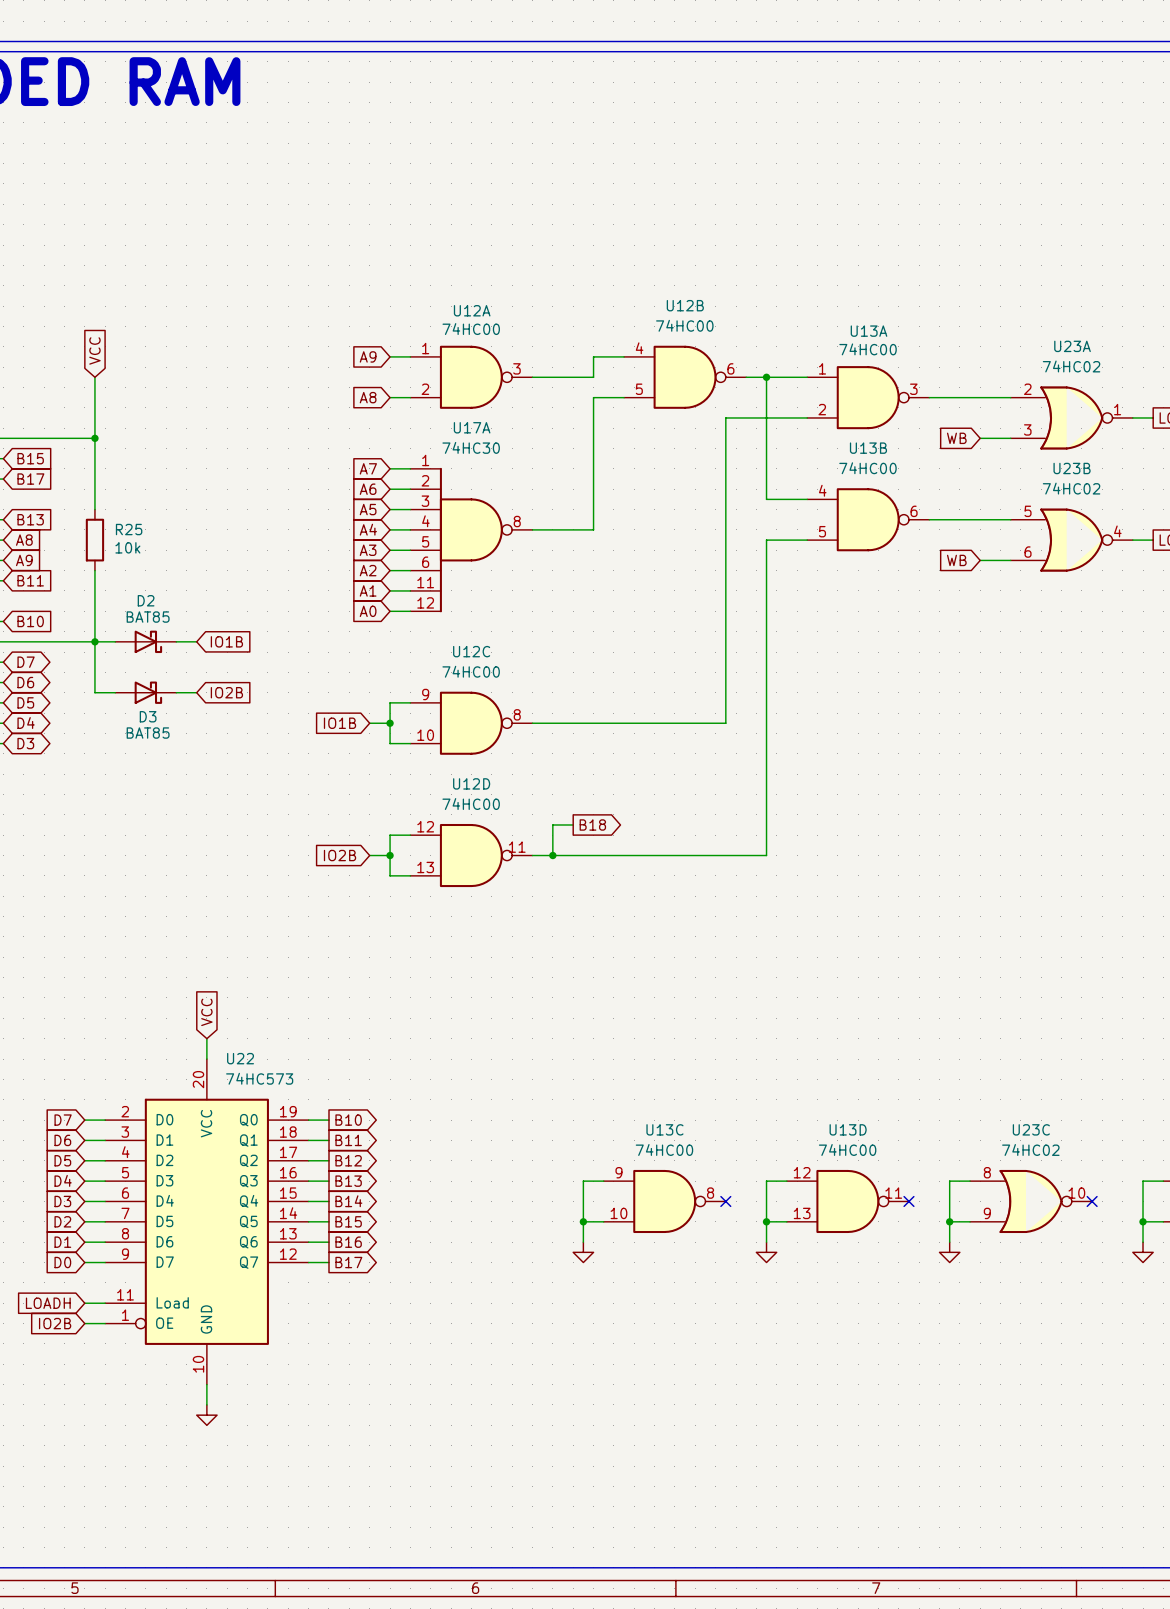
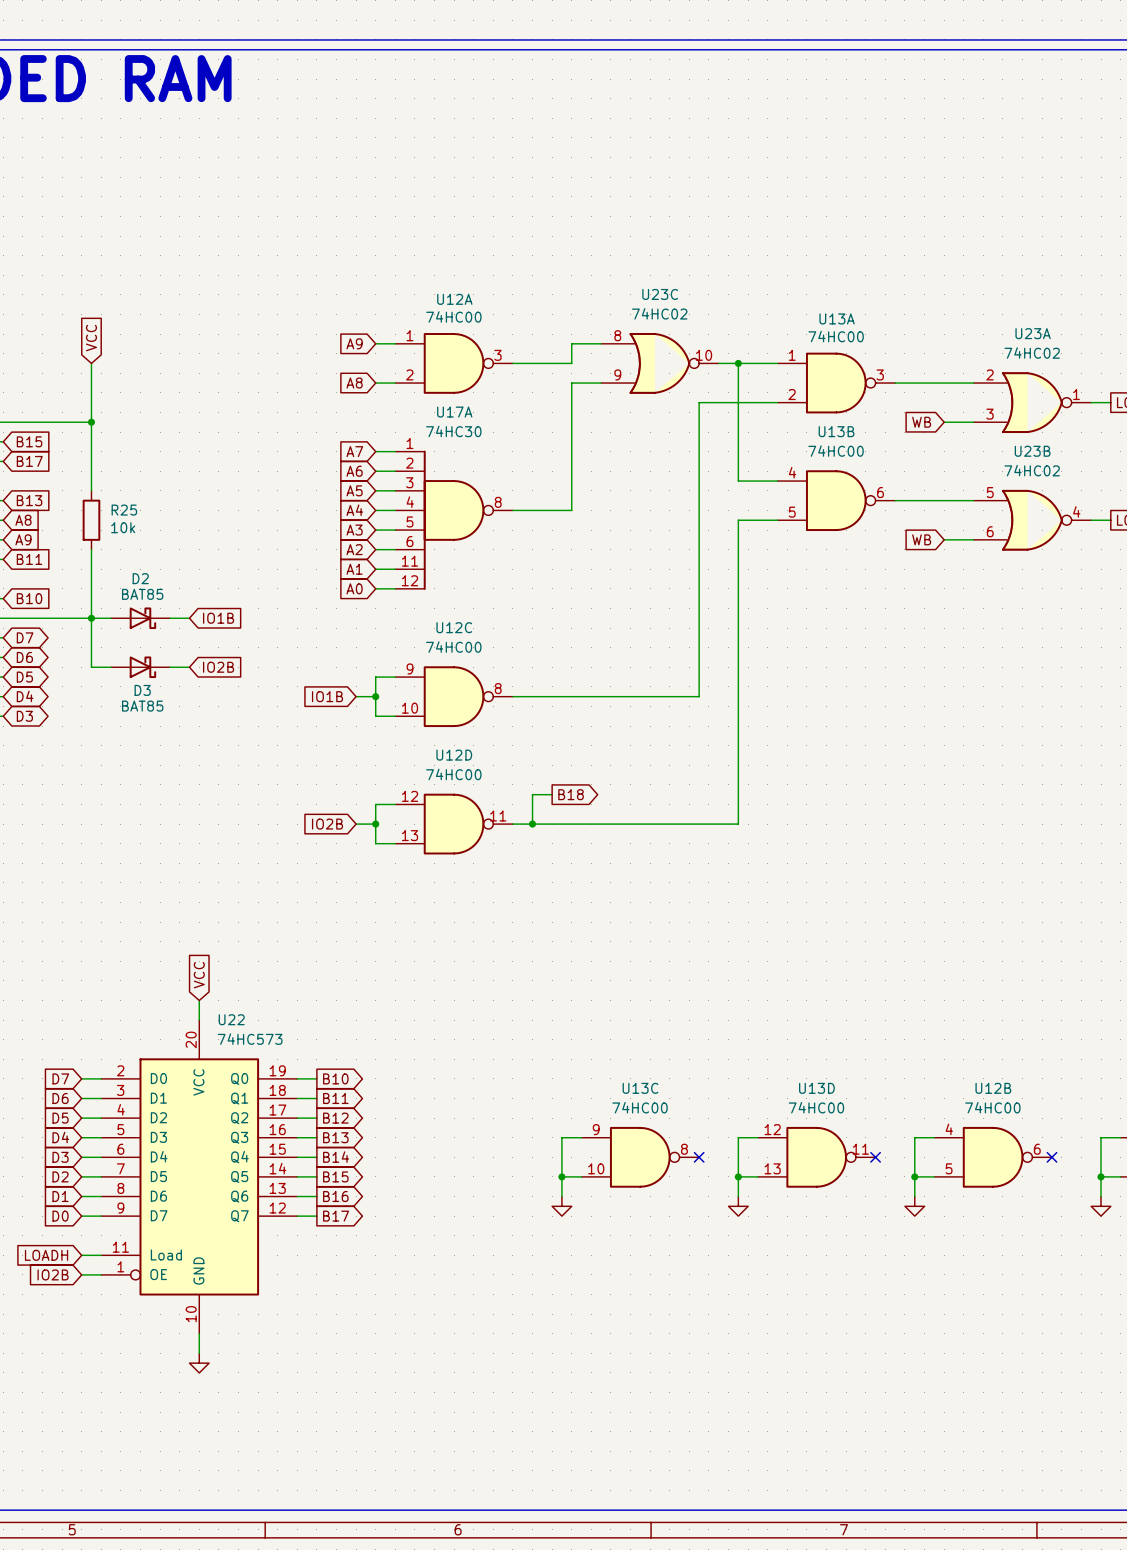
U12B position: (685, 377) -> (993, 1157)
U23C position: (1031, 1201) -> (659, 363)

